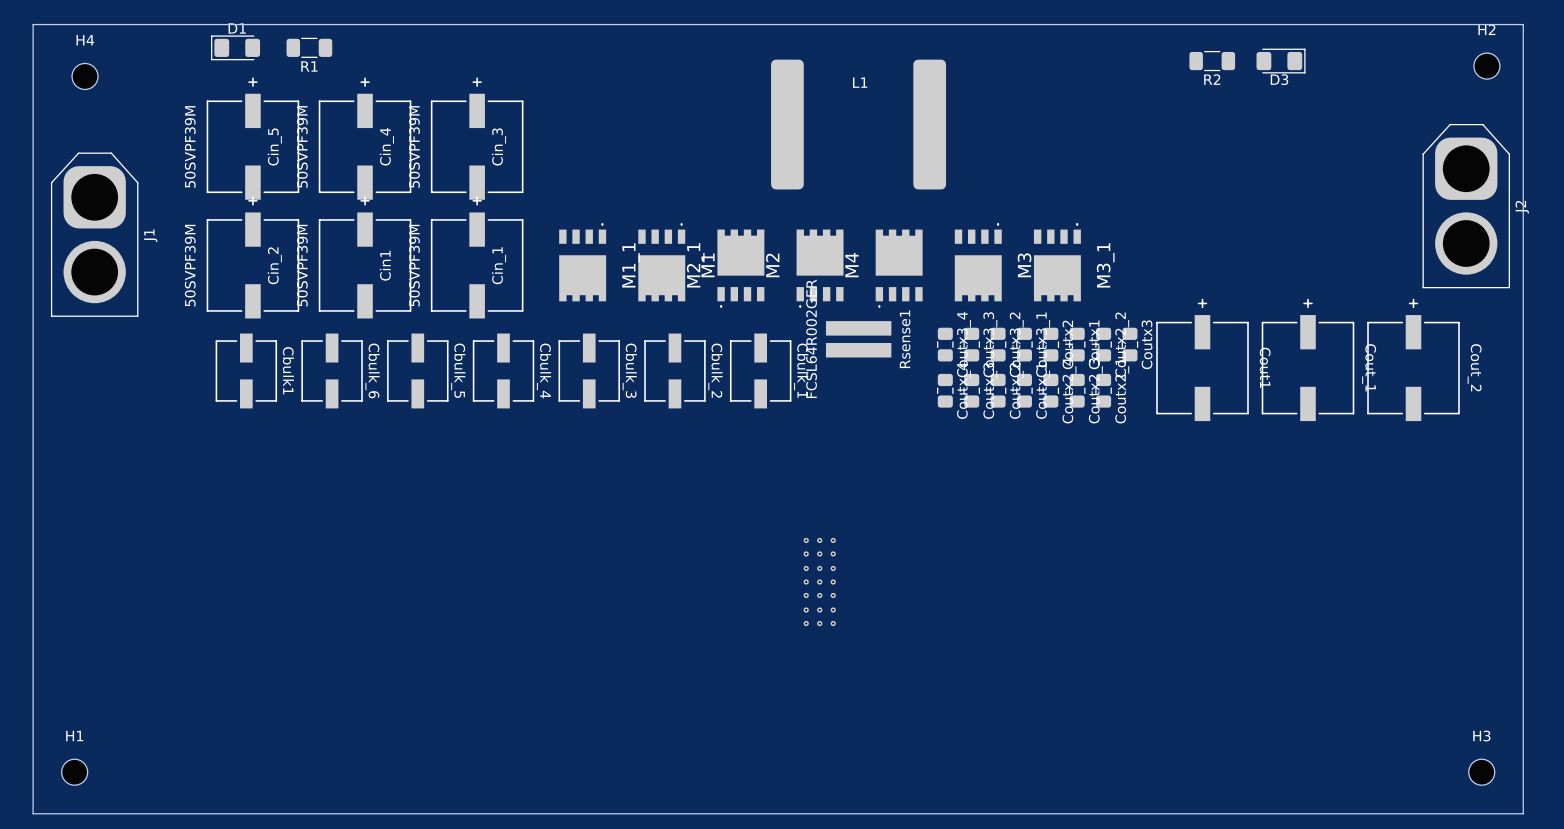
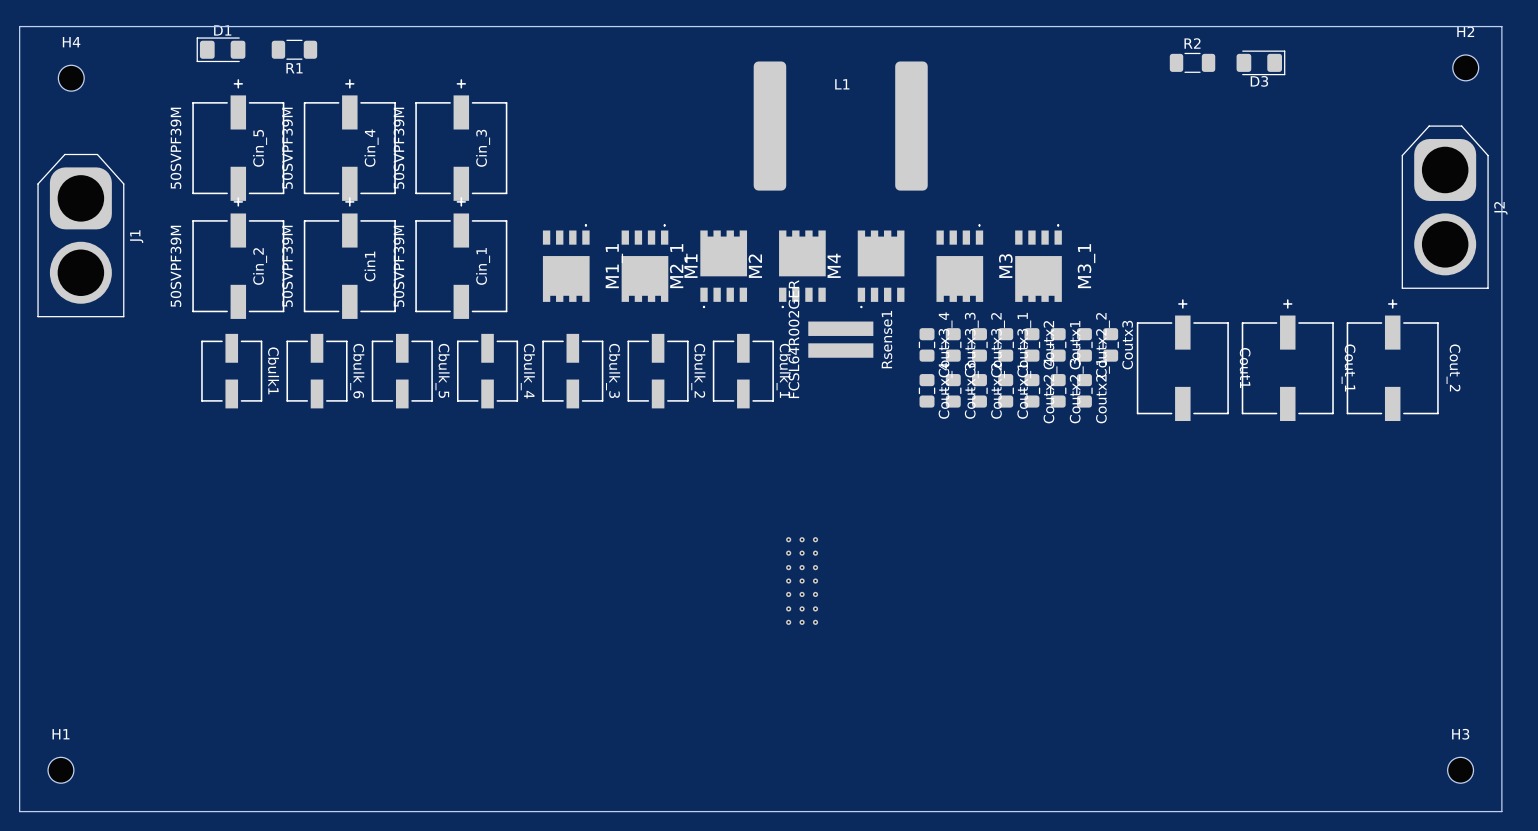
R2 name position: R2 (1212, 79) -> R2 (1192, 43)

